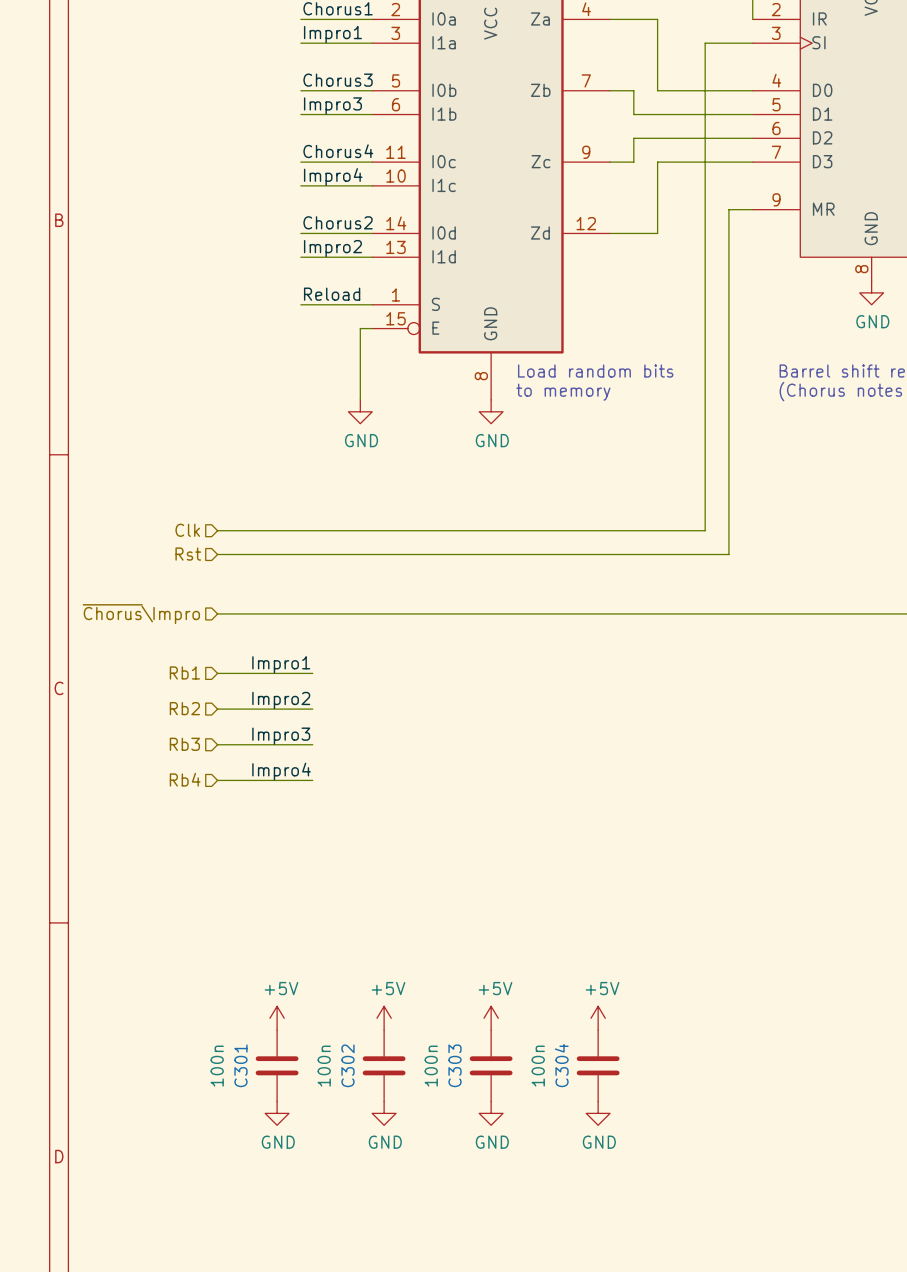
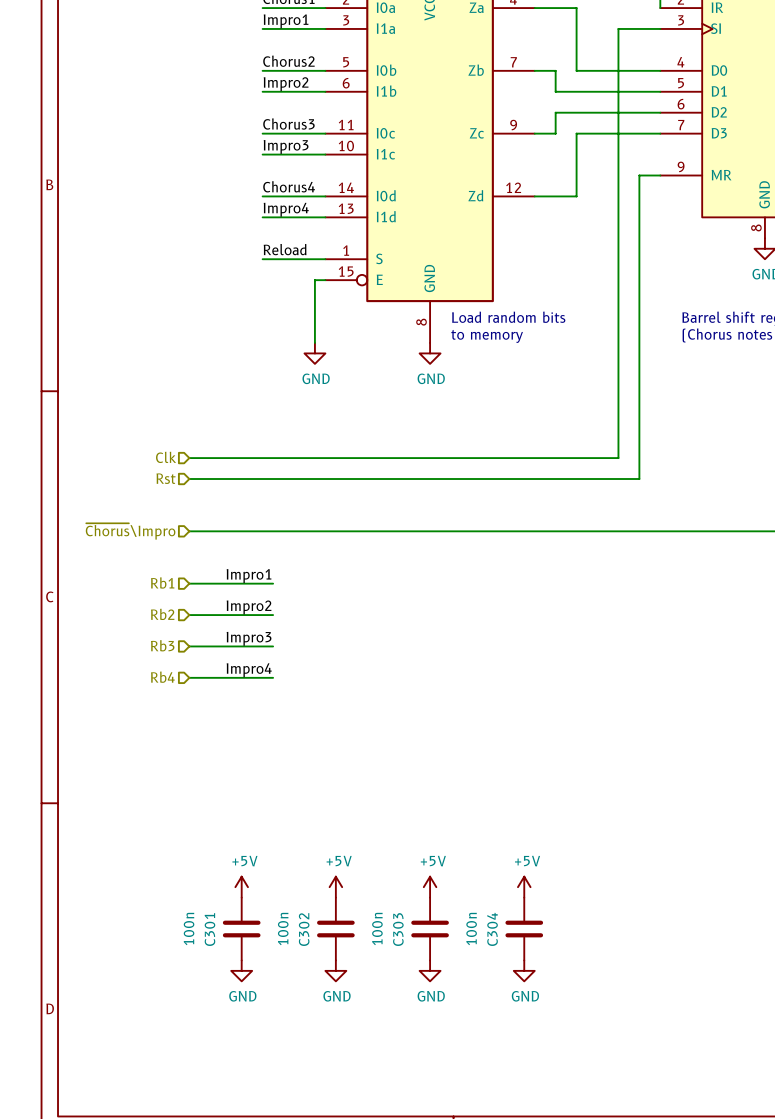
label: Chorus3 (338, 80) -> Chorus2 (288, 61)
label: Impro3 (332, 105) -> Impro2 (286, 84)
label: Chorus4 (338, 151) -> Chorus3 (288, 124)
label: Impro4 (333, 176) -> Impro3 (286, 146)
label: Chorus2 (338, 222) -> Chorus4 (289, 186)
label: Impro2 (332, 248) -> Impro4 (286, 209)

